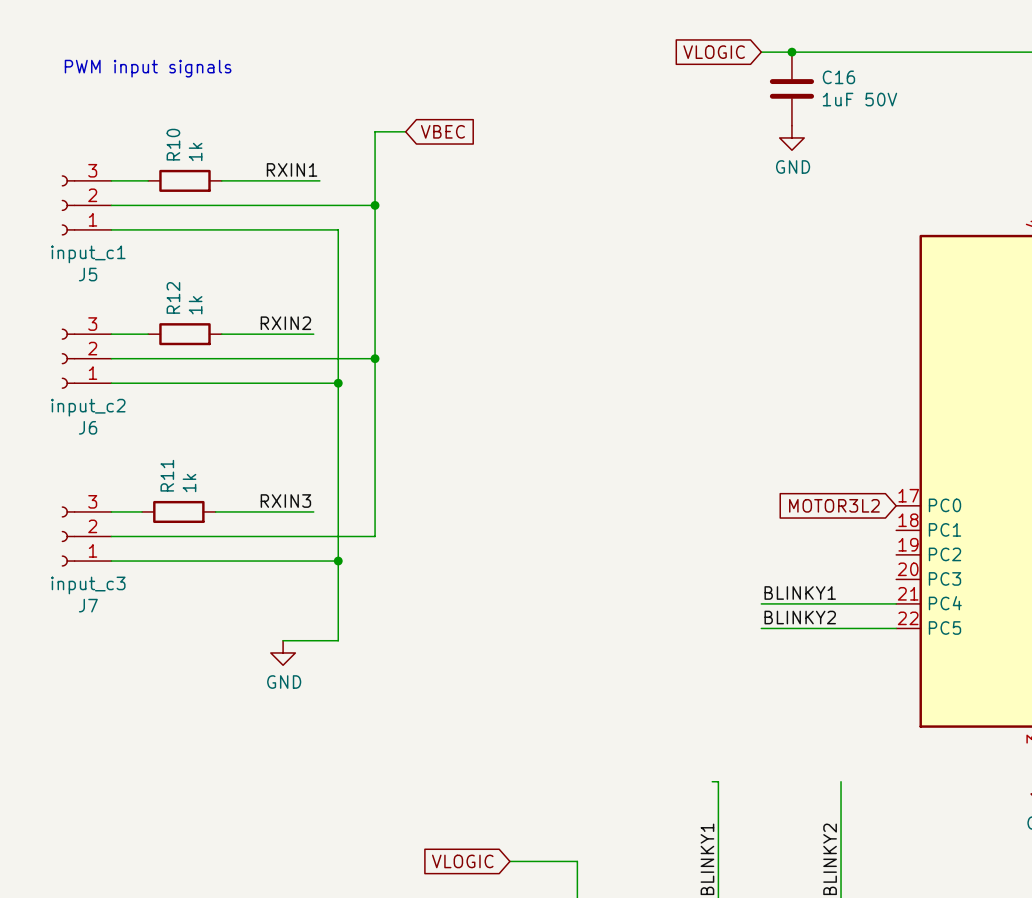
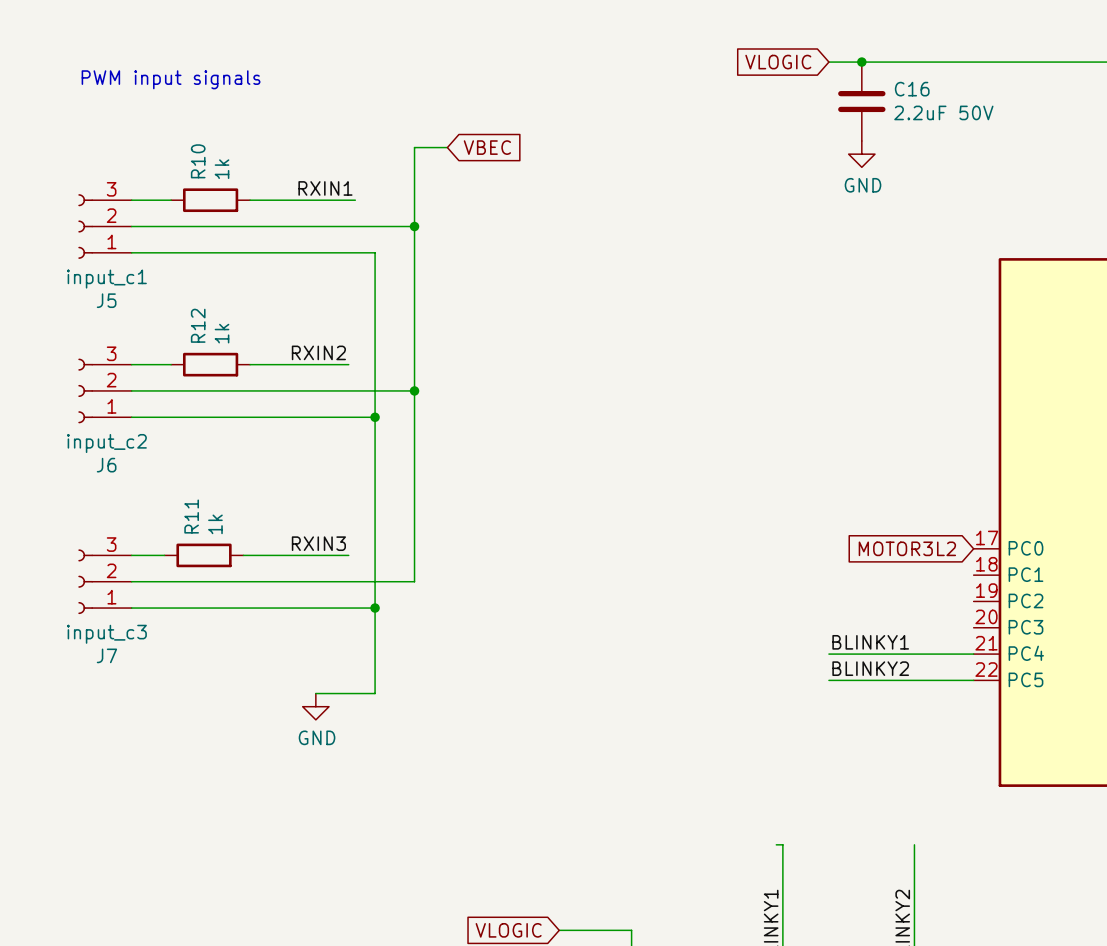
C16 value: 1uF 50V (859, 99) -> 2.2uF 50V (943, 112)

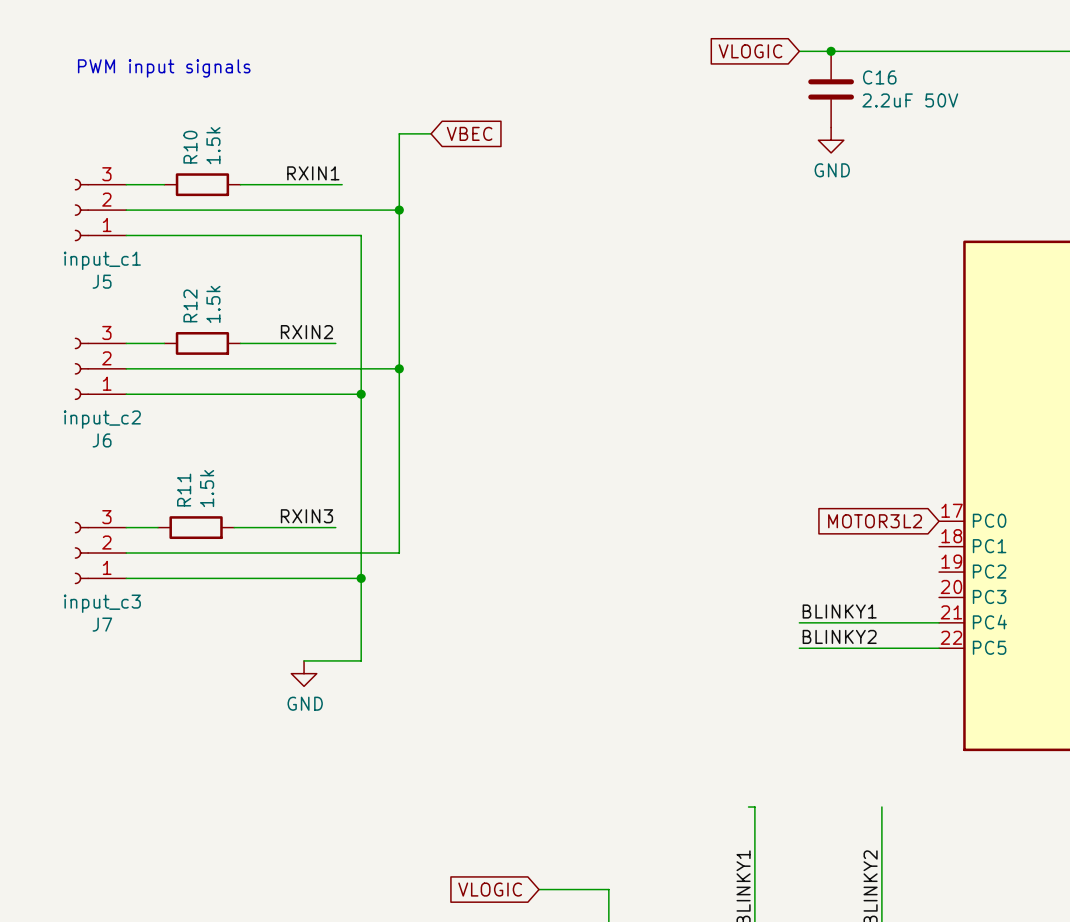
R10 value: 1k (222, 169) -> 1.5k (213, 145)
R12 value: 1k (222, 333) -> 1.5k (213, 304)
R11 value: 1k (215, 524) -> 1.5k (207, 488)

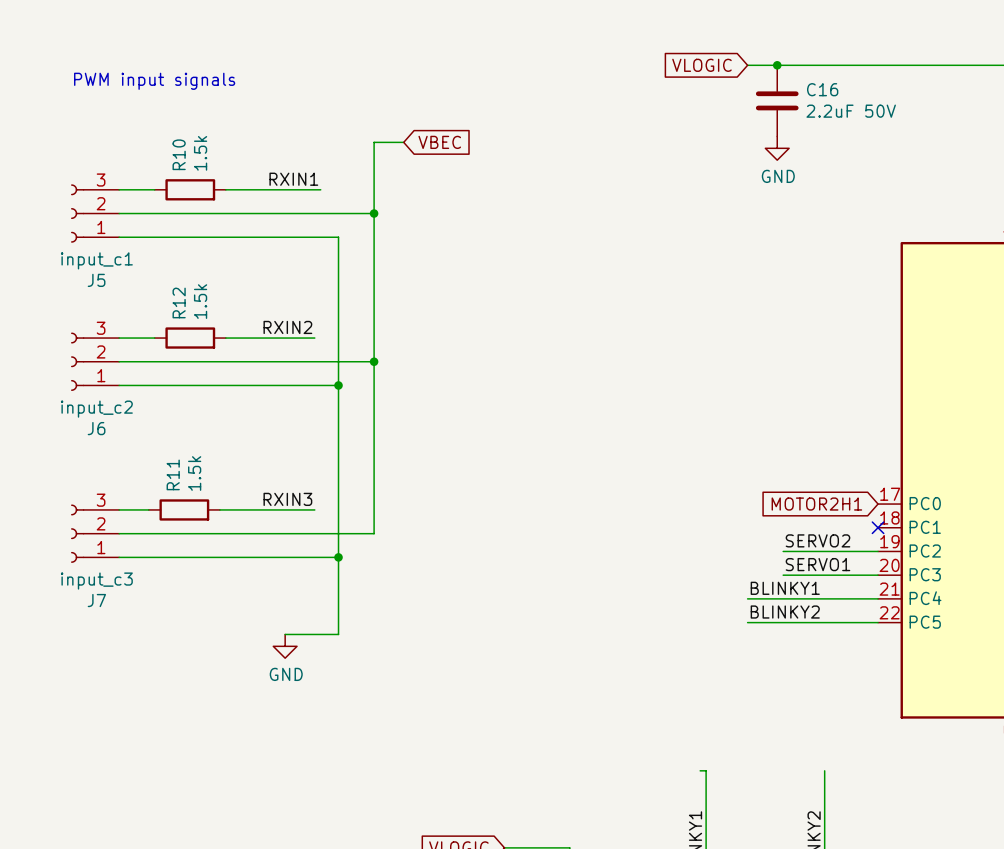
global label: MOTOR3L2 (875, 521) -> MOTOR2H1 (816, 504)
no-connect mark: none -> (878, 527)
label: none -> SERVO2 (817, 540)
wire: none -> (783, 551) (878, 551)
label: none -> SERVO1 (817, 564)
wire: none -> (783, 575) (878, 575)

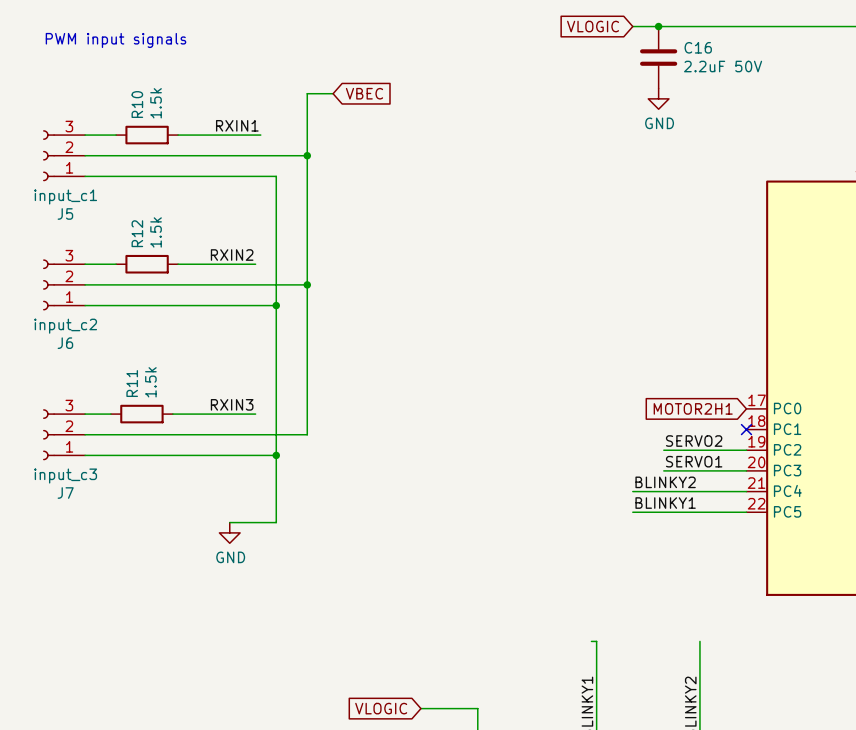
label: BLINKY1 (785, 588) -> BLINKY2 (665, 482)
label: BLINKY2 (785, 612) -> BLINKY1 (665, 503)

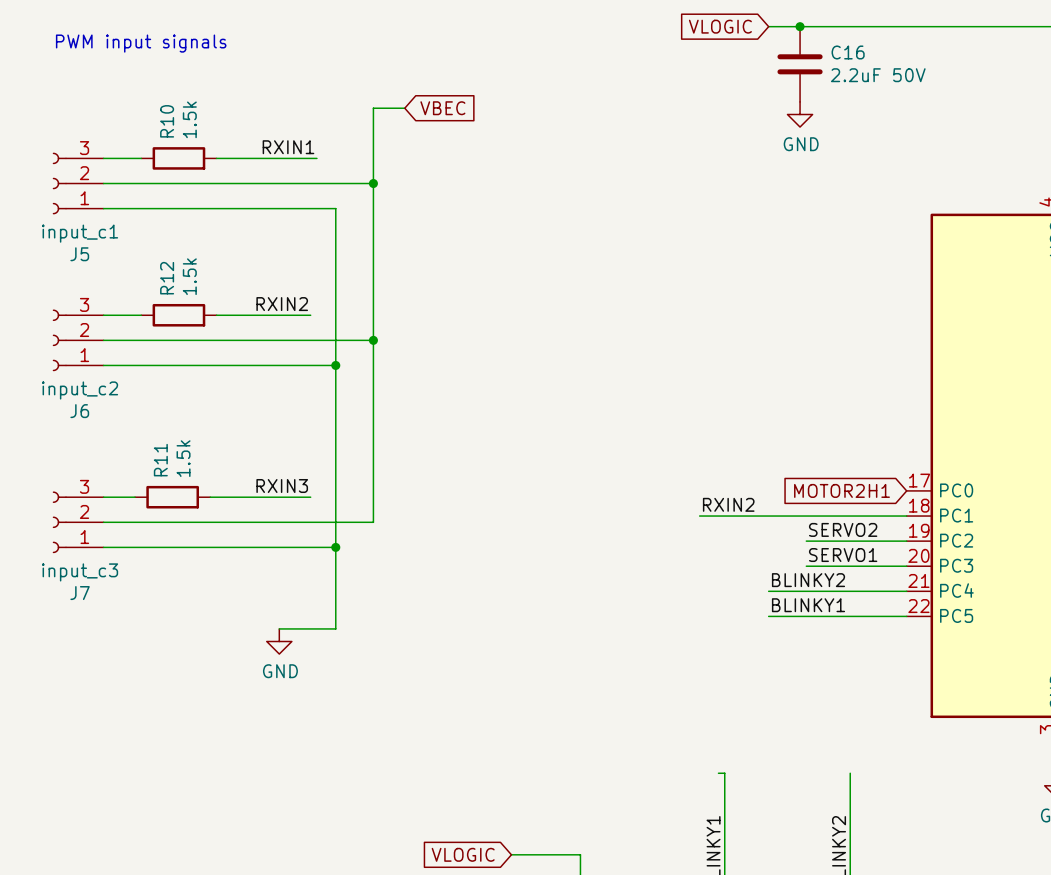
label: none -> RXIN2 (728, 504)
wire: none -> (699, 516) (906, 516)
no-connect mark: (746, 429) -> none

